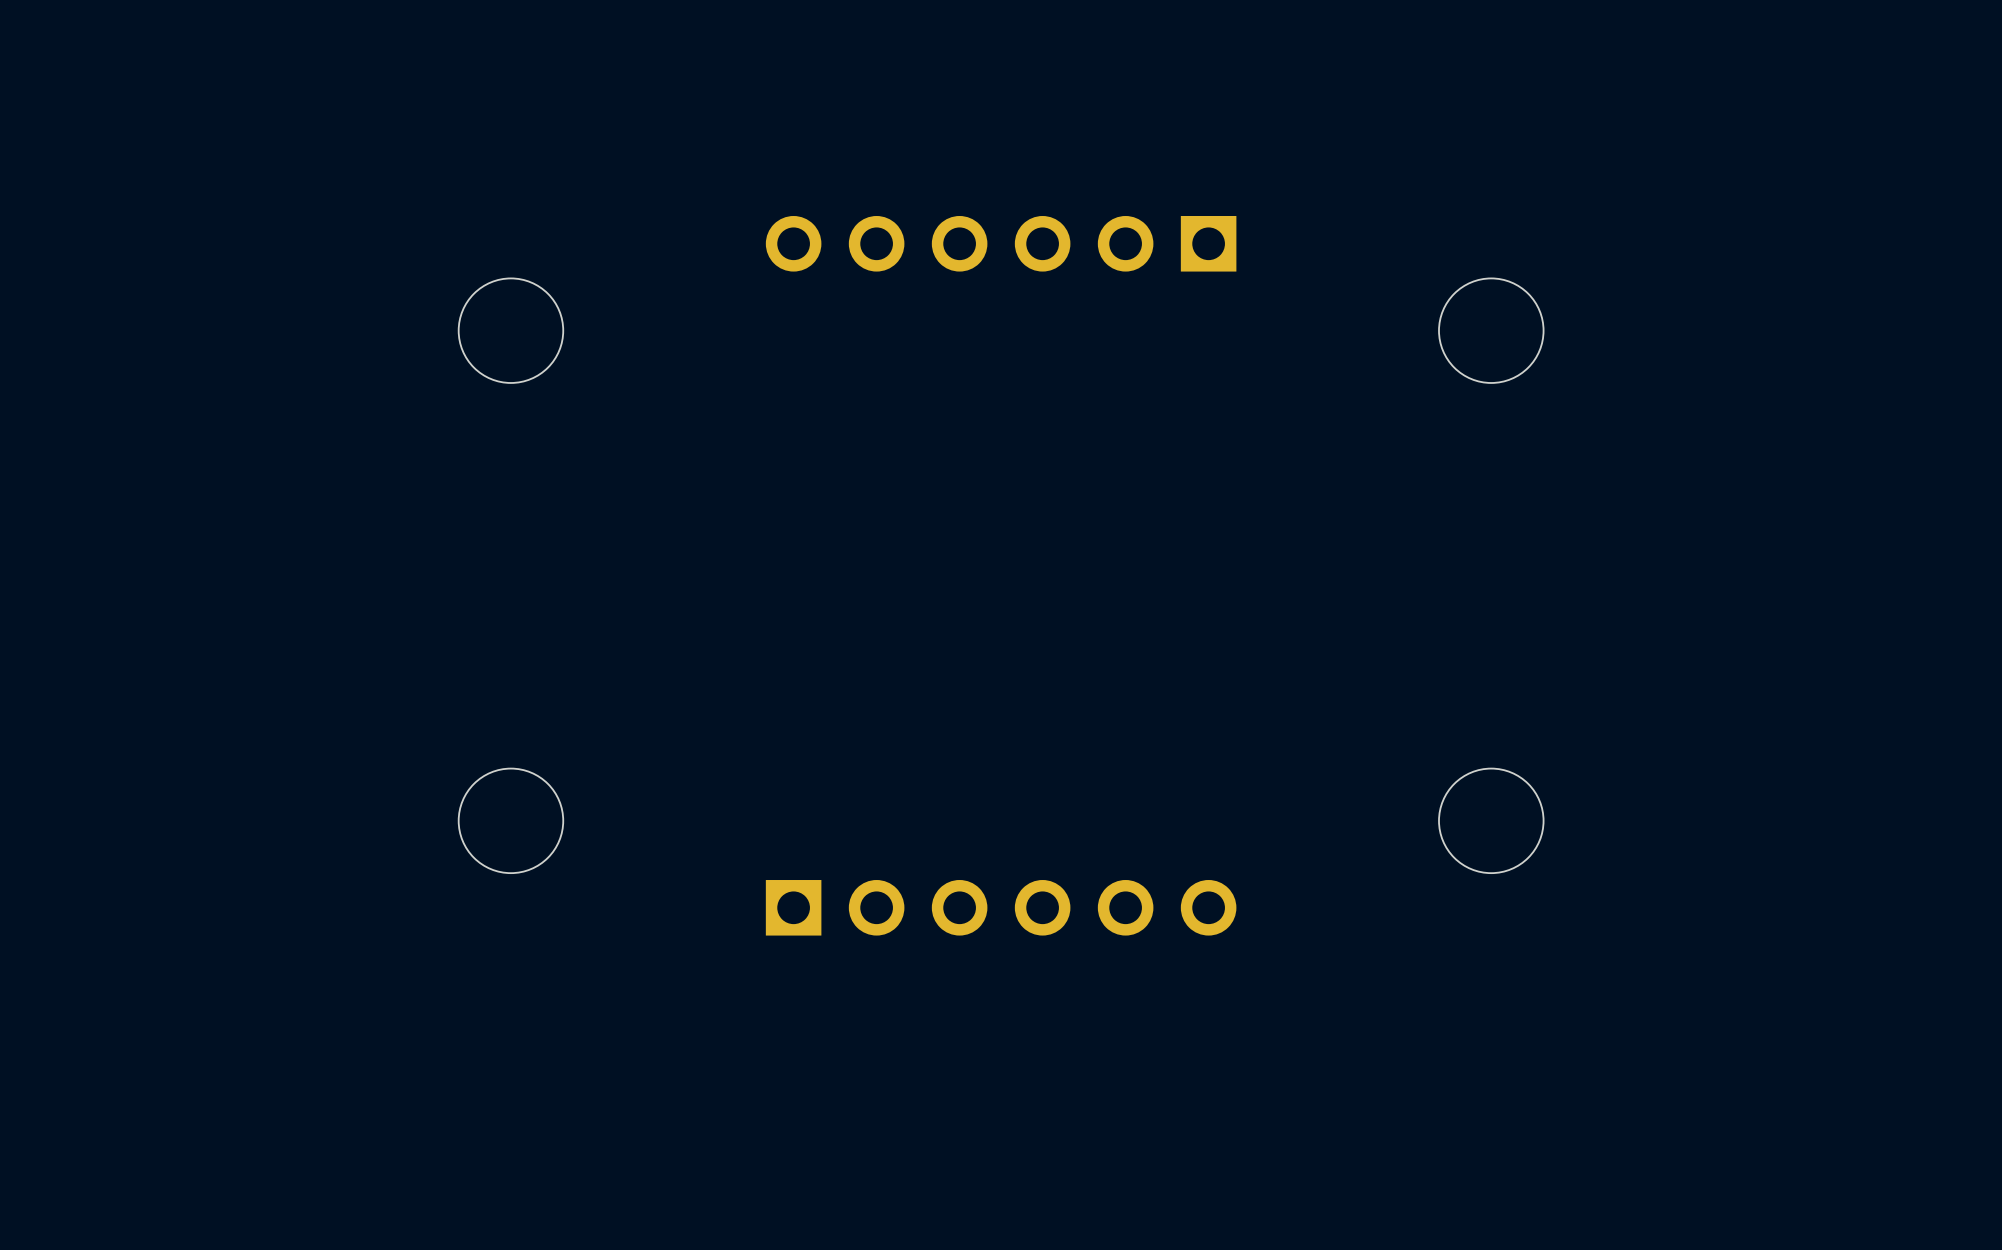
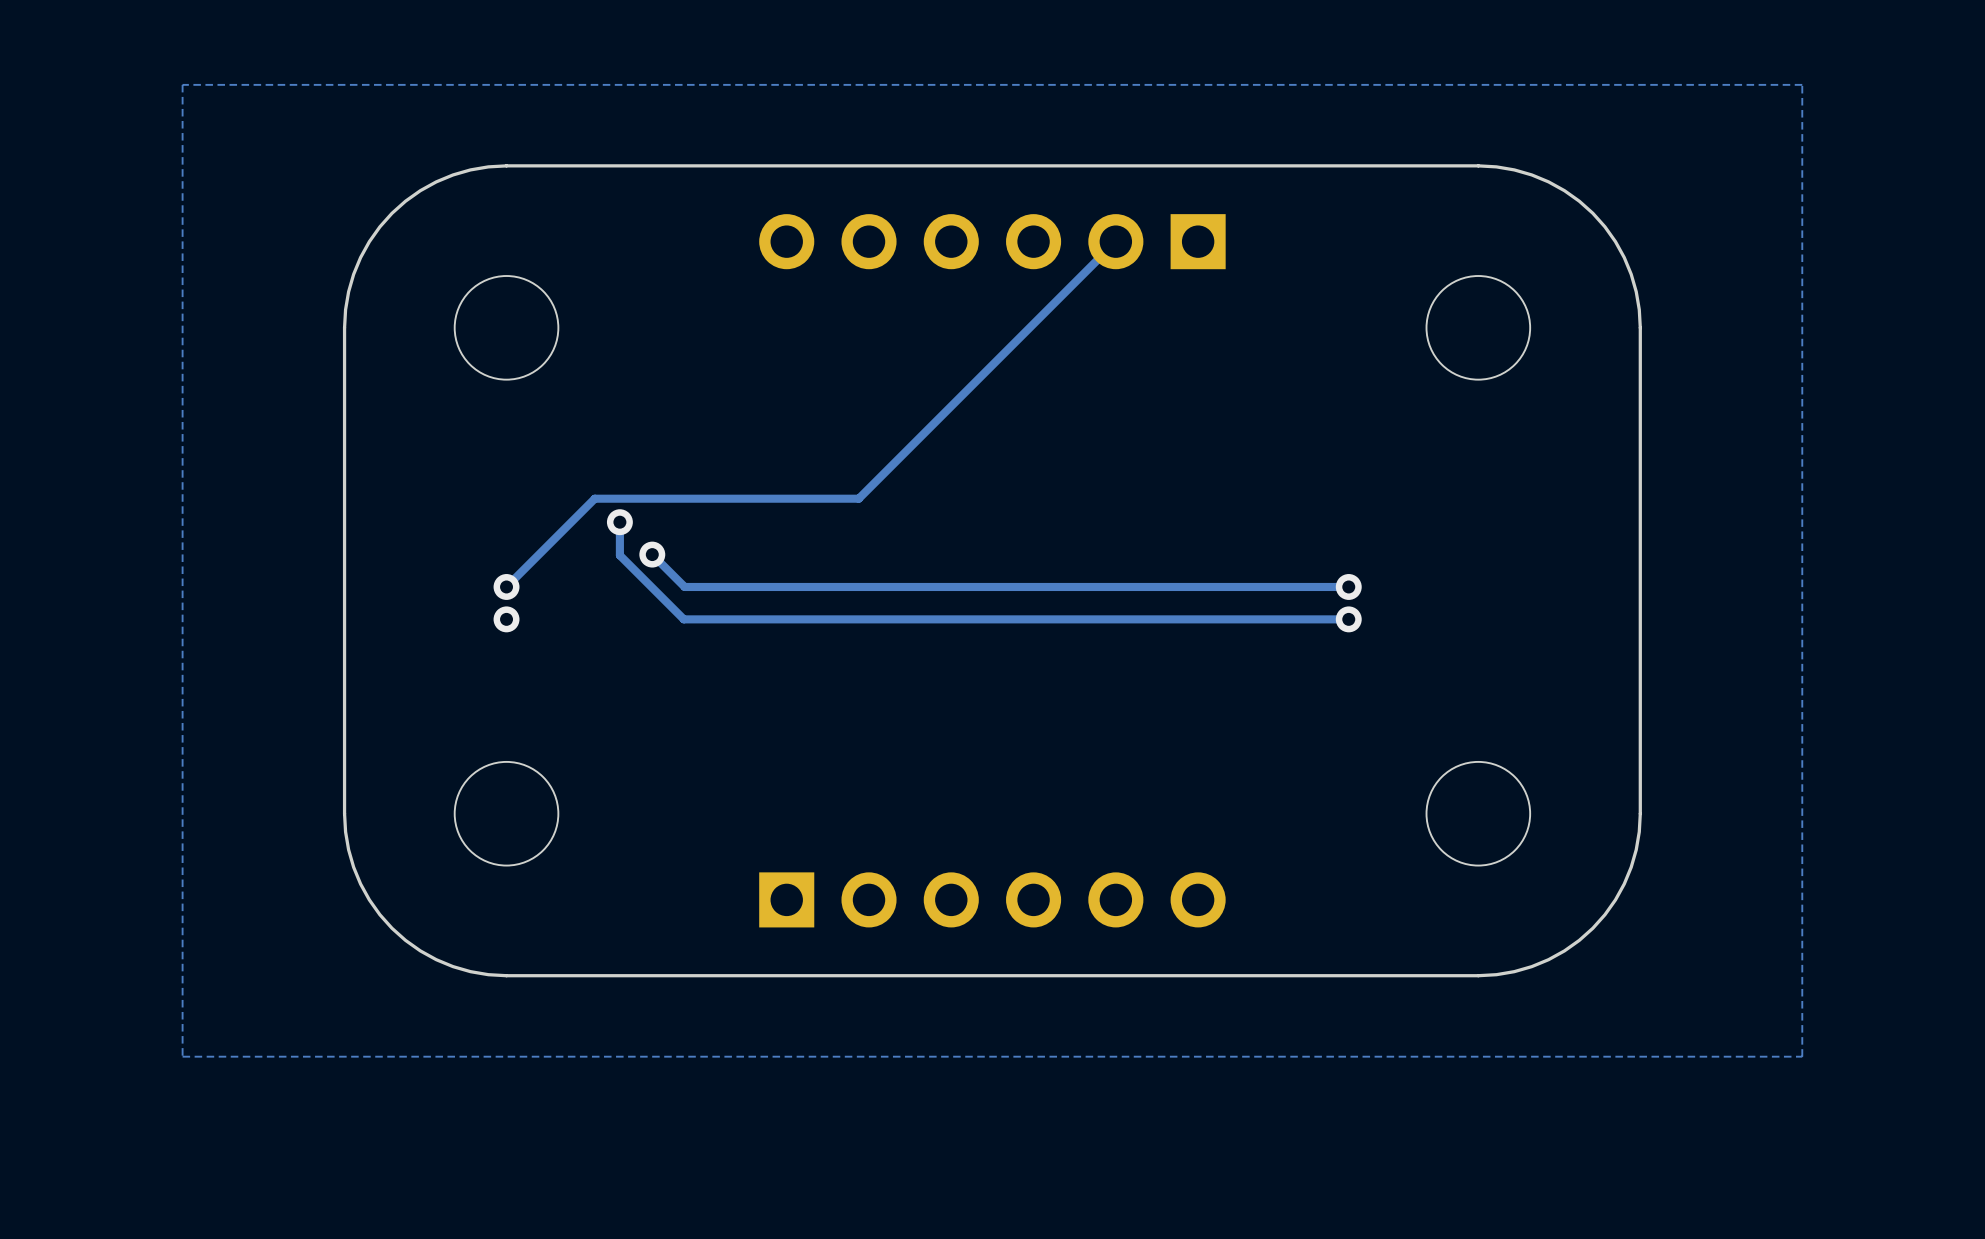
zone outline: none -> (1802, 84) (182, 84) (182, 1056) (1802, 1056) (1802, 84)
board edge: none -> (1478, 165) (506, 165) (470, 169) (436, 181) (420, 190) (391, 213) (369, 241) (353, 274) (345, 309) (344, 813) (345, 831) (353, 867) (369, 899) (391, 928) (420, 950) (453, 966) (470, 971) (506, 975) (1478, 975) (1514, 971) (1548, 959) (1564, 950) (1592, 928) (1615, 899) (1631, 867) (1639, 831) (1639, 309) (1631, 274) (1624, 257) (1615, 241) (1592, 213) (1564, 190) (1548, 181) (1514, 169) (1478, 165)
track: none -> (1115, 241) (858, 498) (594, 498) (506, 586)
track: none -> (619, 522) (619, 555) (683, 619) (1348, 619)
via: none -> (619, 522)
track: none -> (652, 554) (684, 586) (1348, 586)
via: none -> (652, 554)
via: none -> (506, 586)
via: none -> (1348, 586)
via: none -> (506, 619)
via: none -> (1348, 619)

